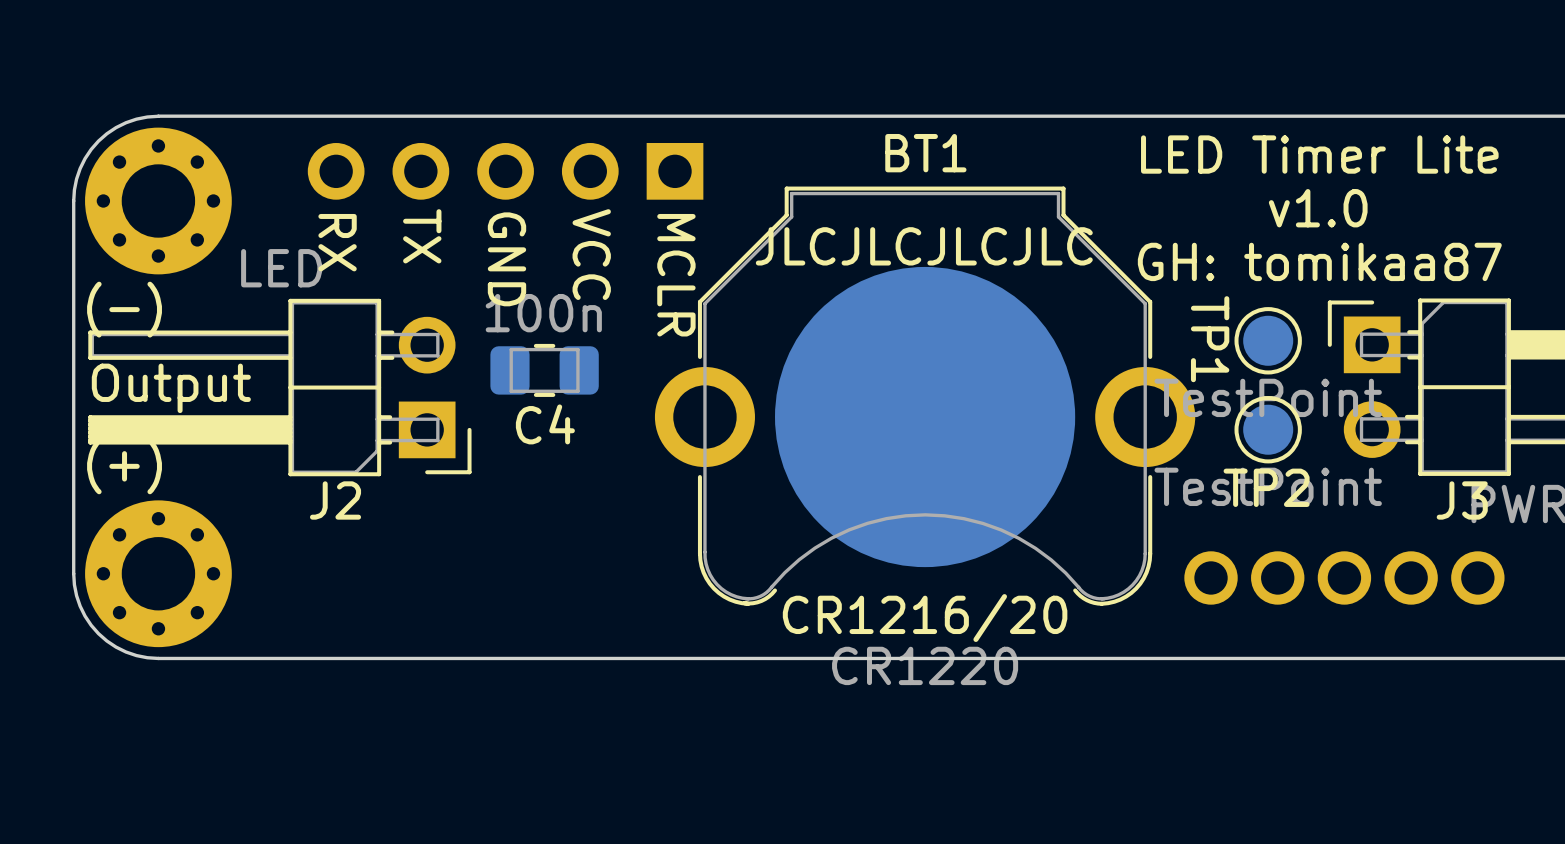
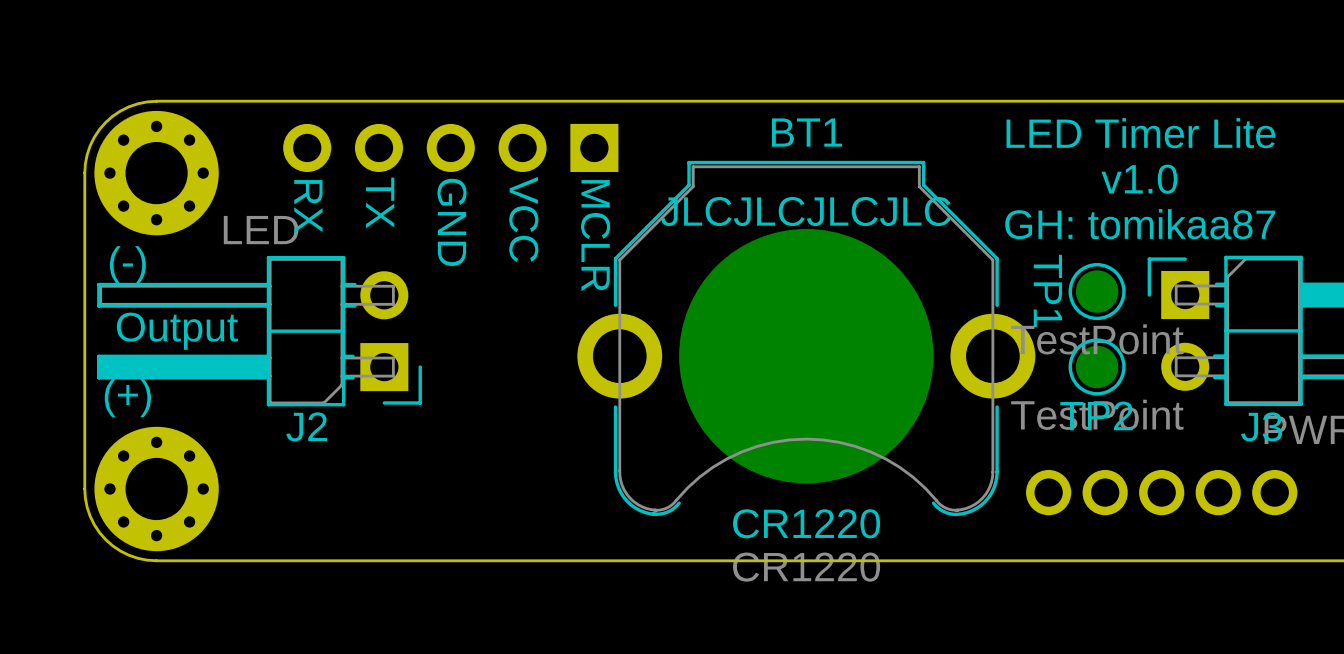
C4: 100n (544, 370) -> none
text: CR1216/20 (925, 618) -> CR1220 (806, 523)

